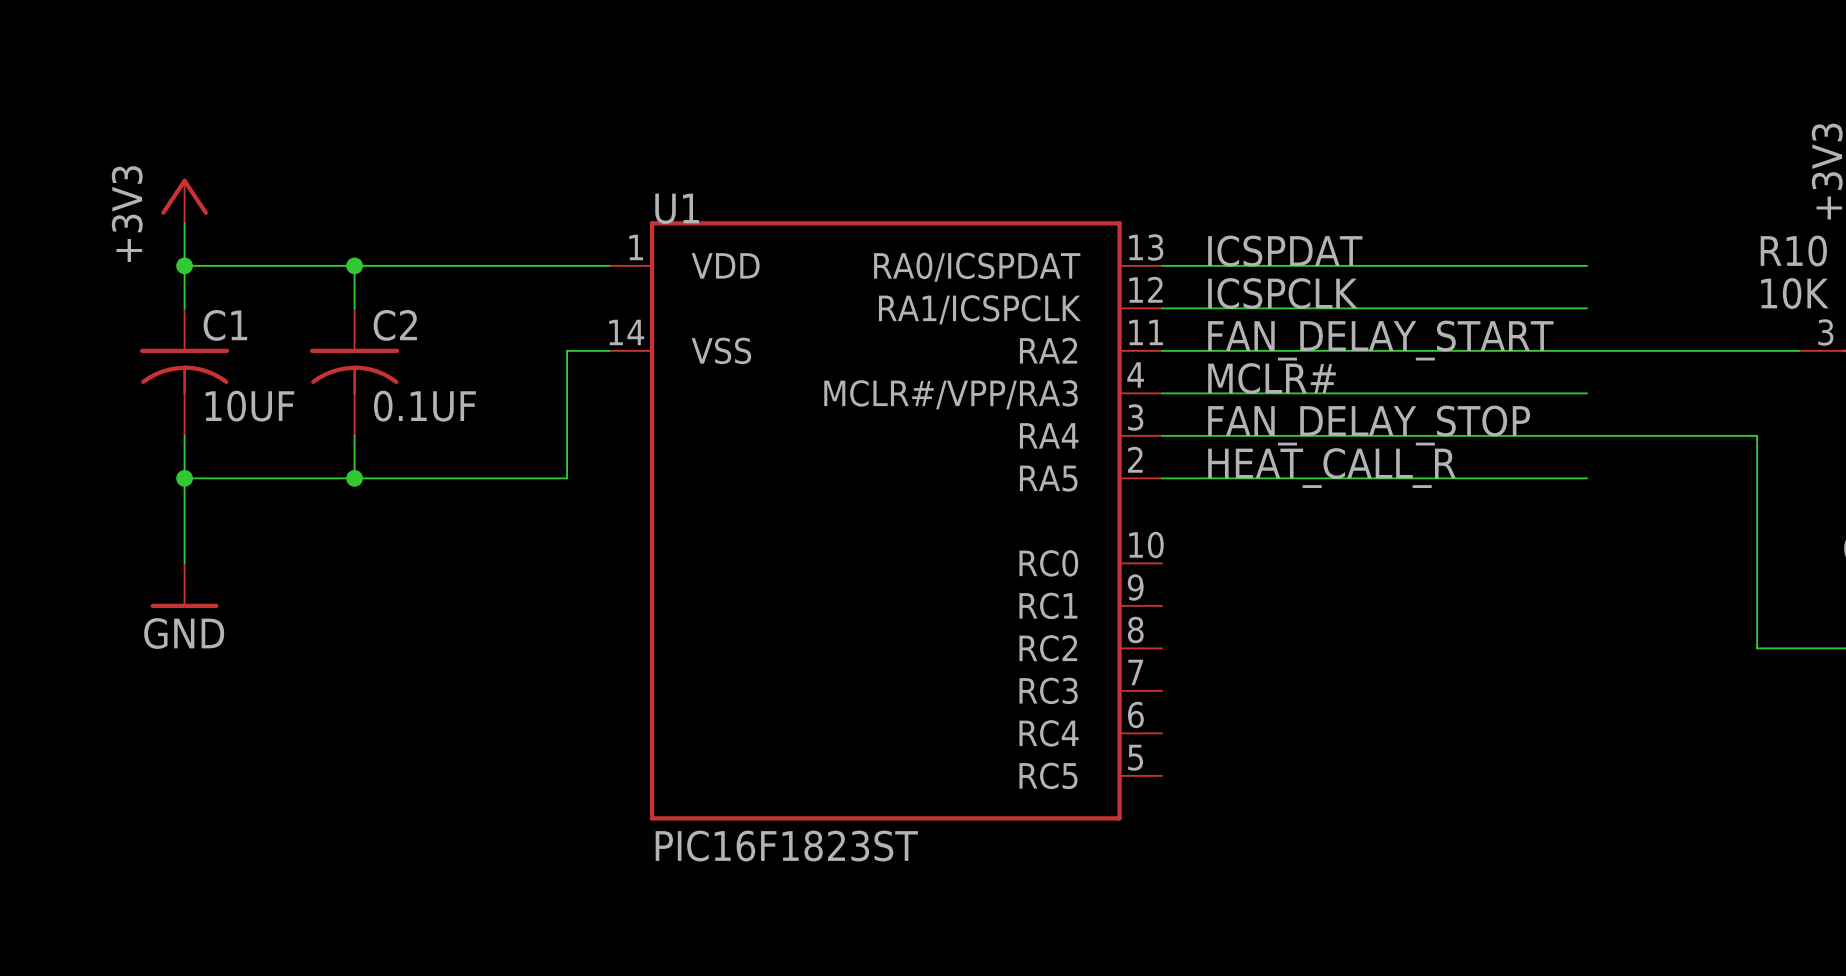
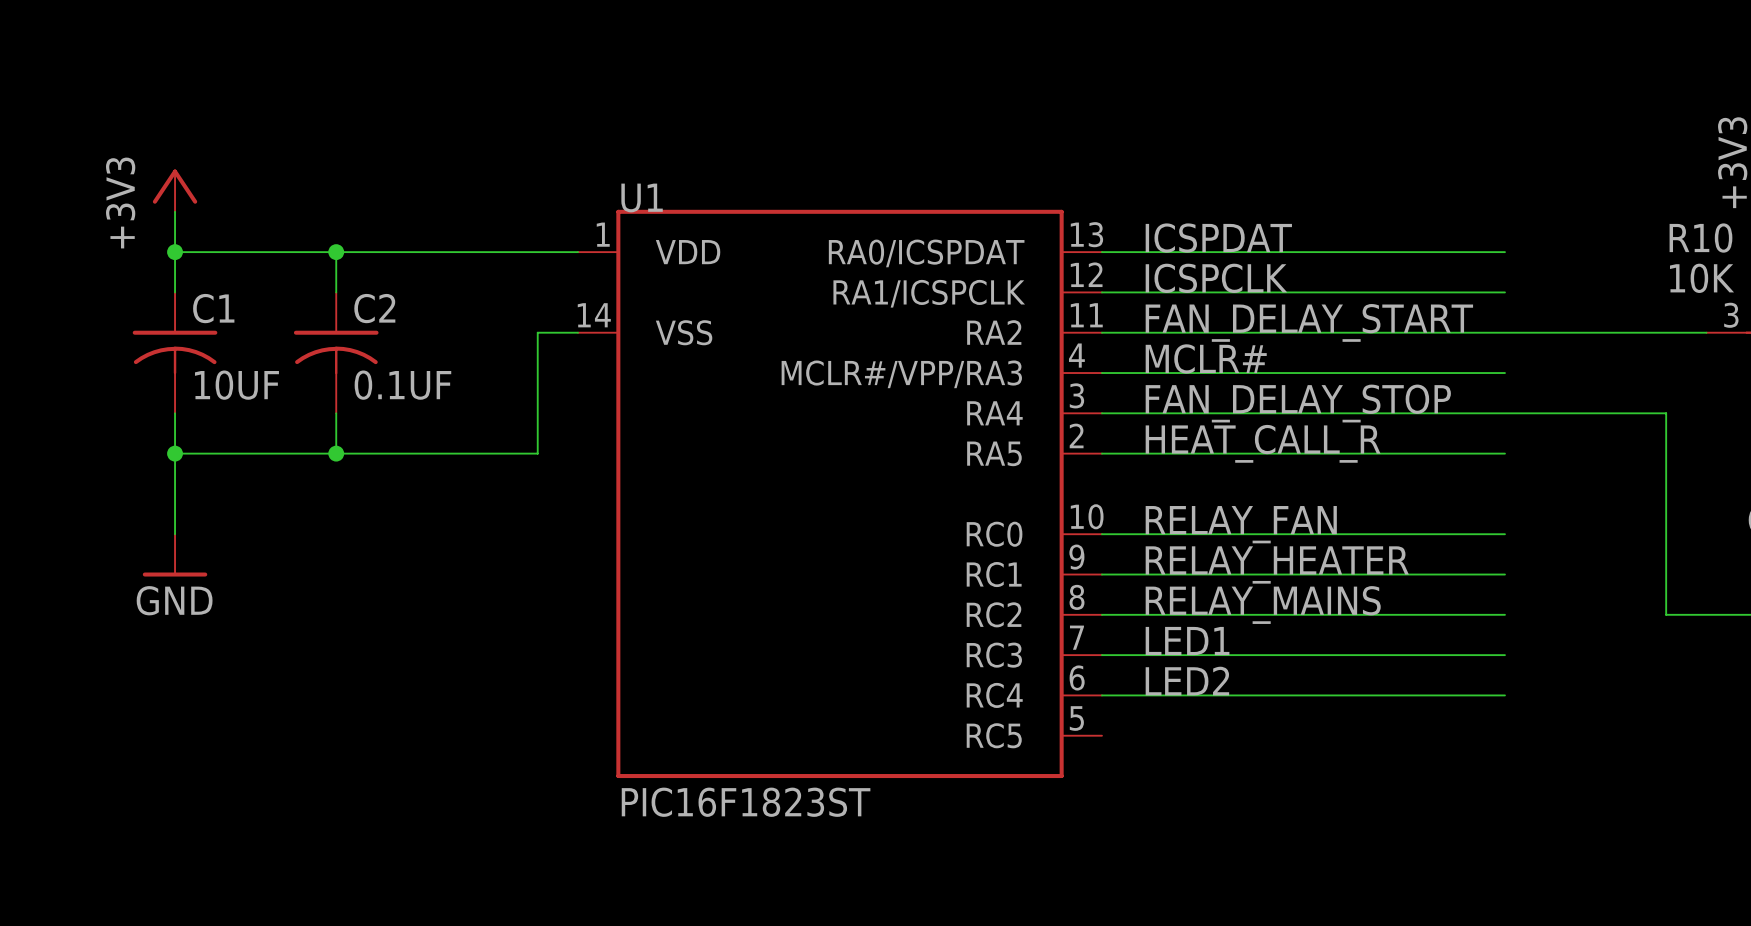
label: none -> RELAY_FAN (1241, 524)
wire: none -> (1101, 534) (1504, 534)
label: none -> RELAY_HEATER (1277, 564)
wire: none -> (1101, 574) (1504, 574)
label: none -> RELAY_MAINS (1263, 605)
wire: none -> (1101, 614) (1504, 614)
label: none -> LED1 (1187, 641)
wire: none -> (1101, 655) (1504, 655)
label: none -> LED2 (1187, 681)
wire: none -> (1101, 695) (1504, 695)

